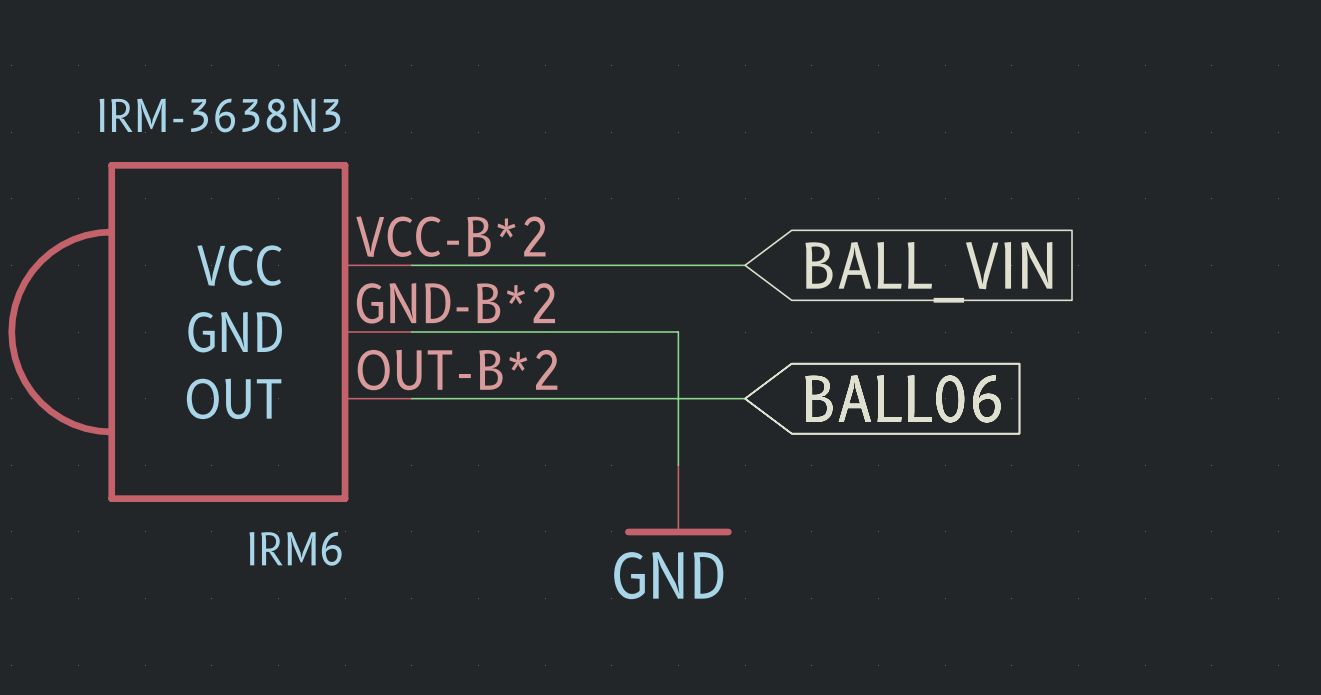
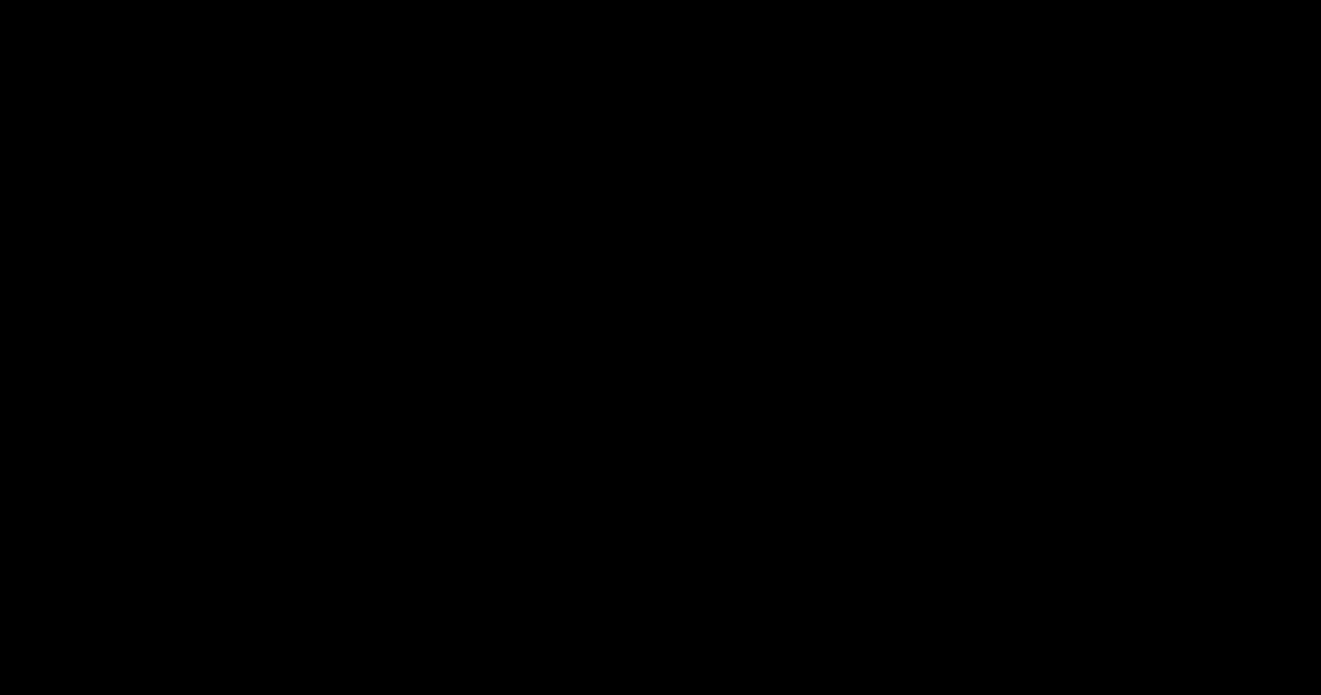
wire: (411, 265) (745, 265) -> none
global label: BALL_VIN (928, 272) -> none
IRM6: IRM-3638N3 (210, 332) -> none
wire: (411, 332) (678, 332) (678, 465) -> none
wire: (411, 398) (745, 398) -> none
global label: BALL06 (903, 398) -> none
power symbol: GND (678, 500) -> none

